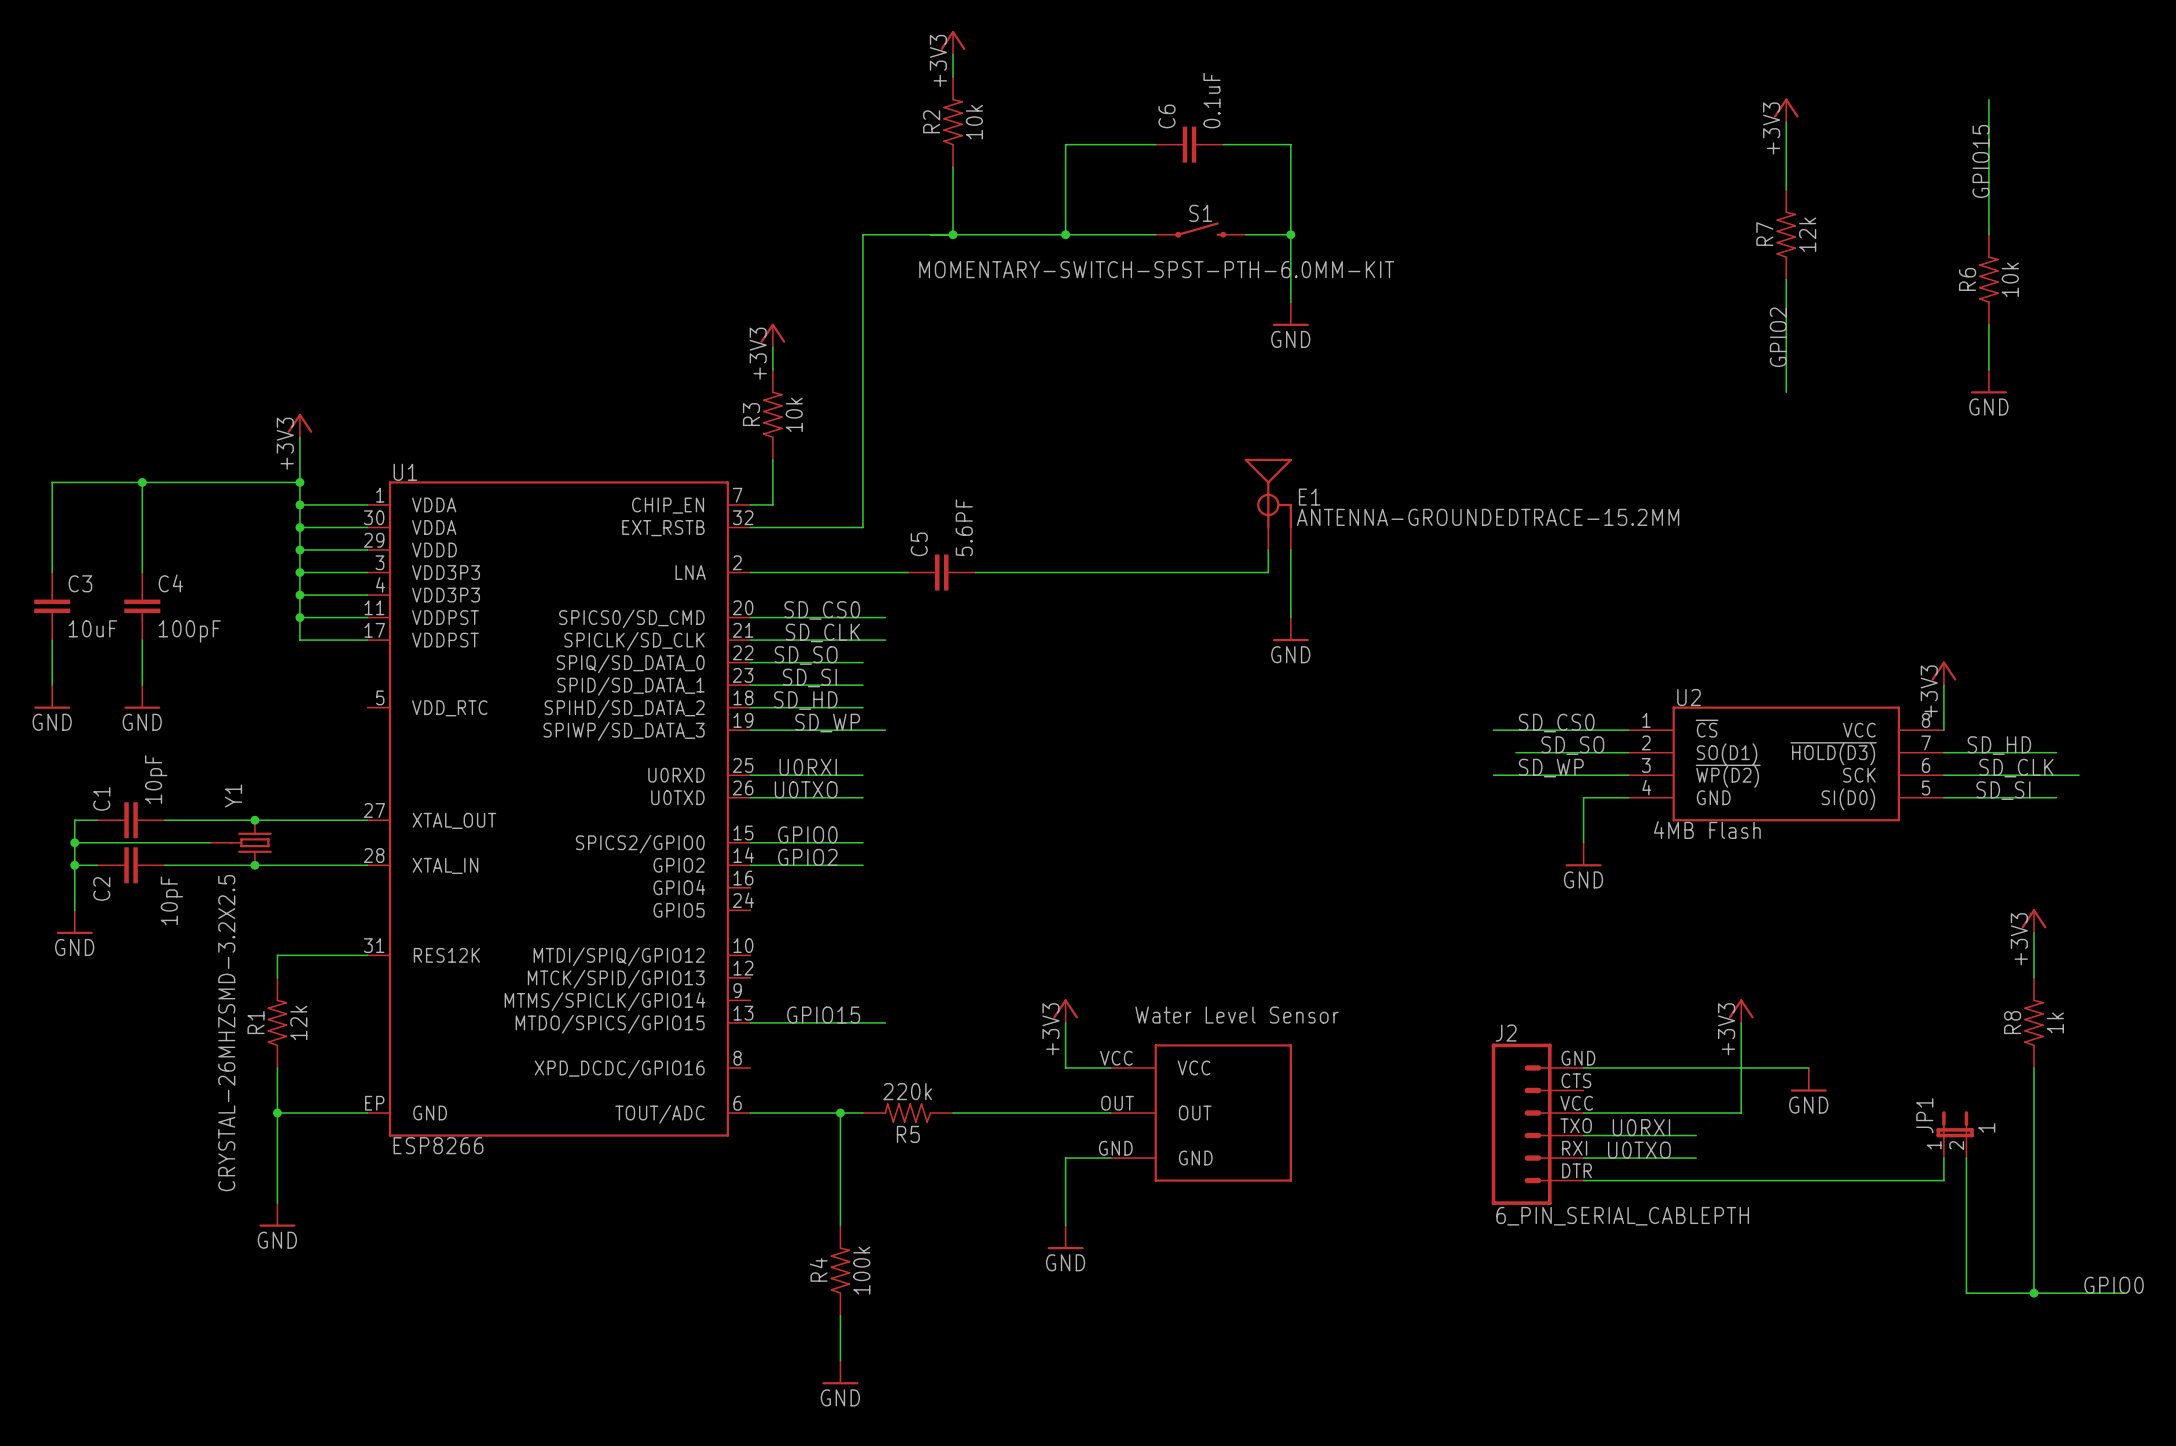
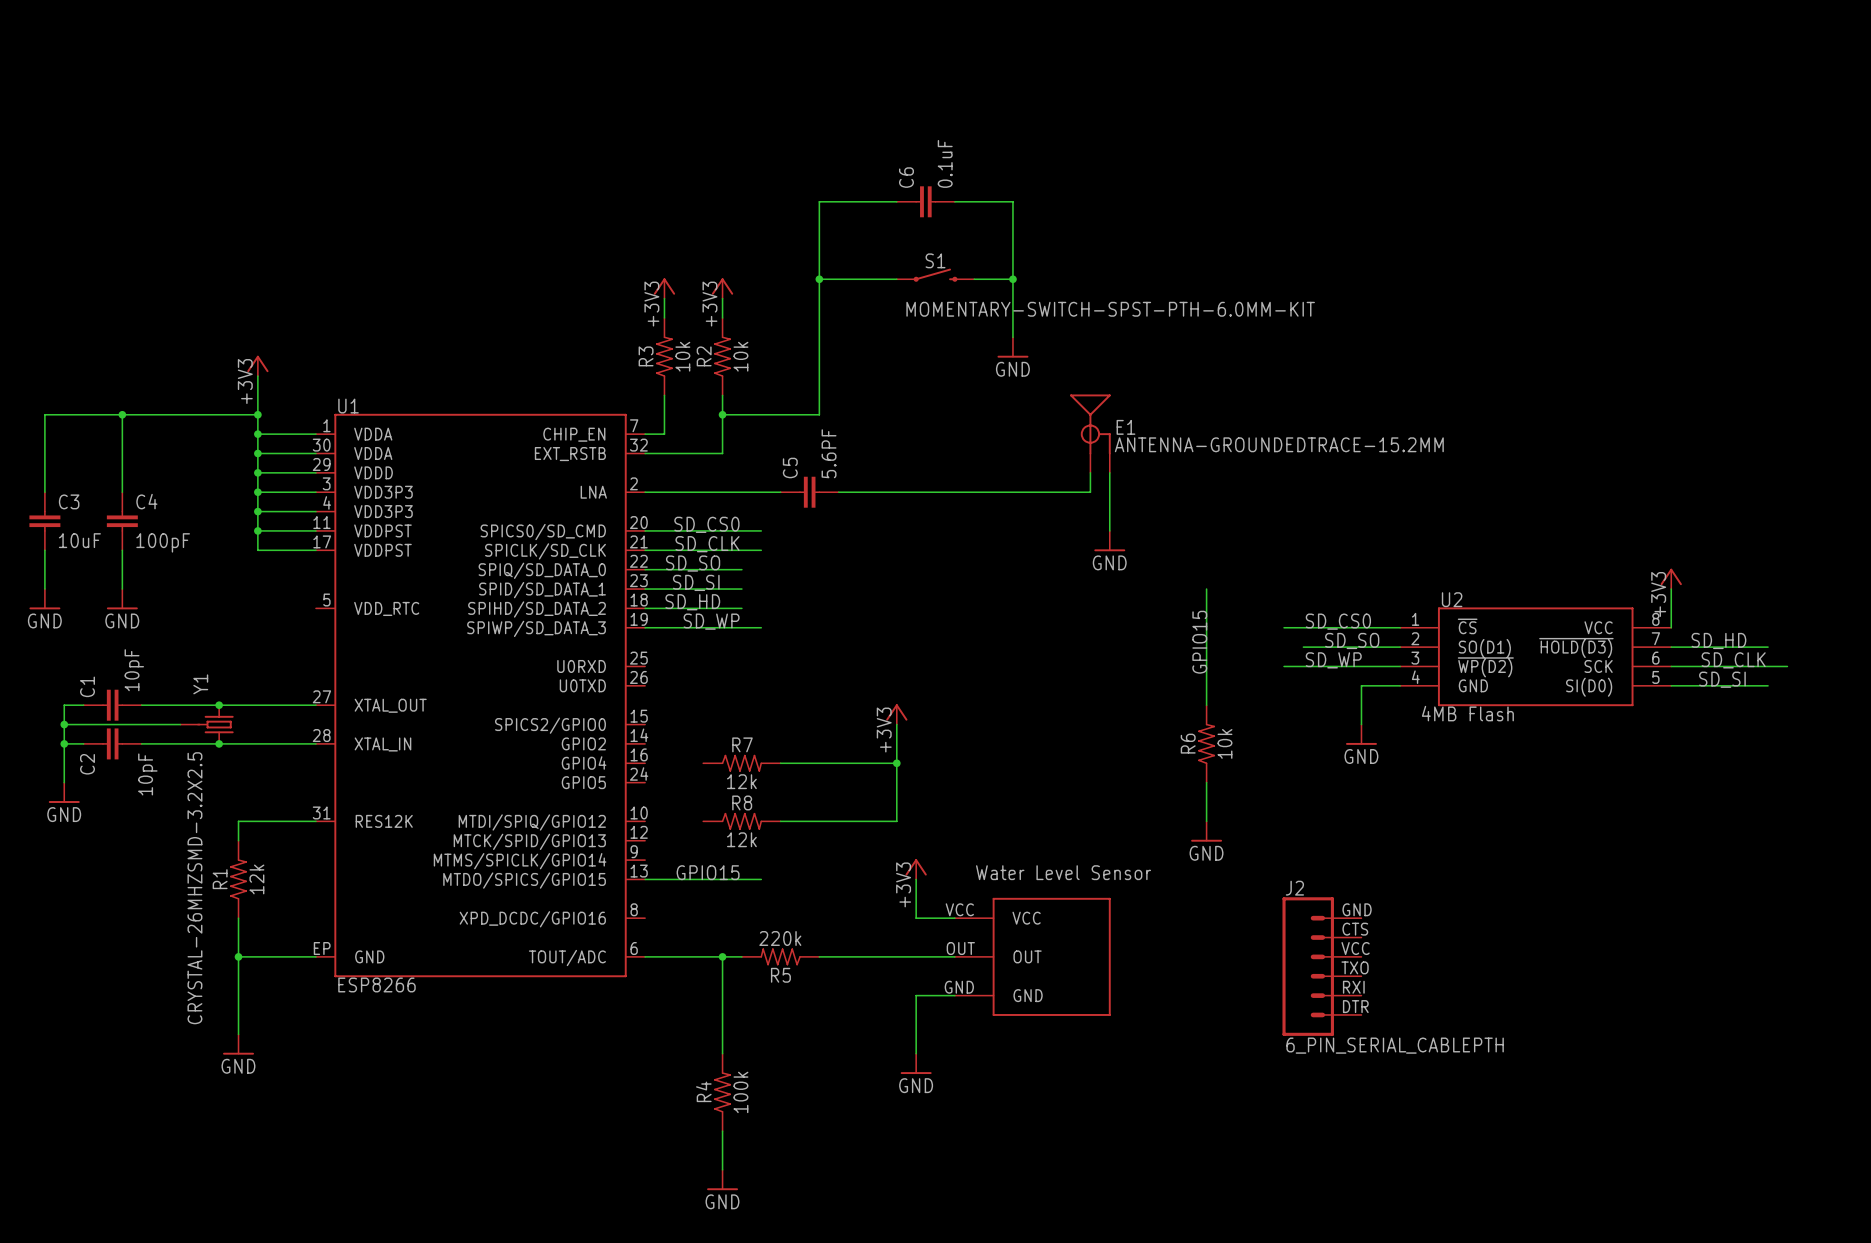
power symbol: +3V3 (953, 42) -> none
wire: (953, 54) (953, 77) -> none
wire: (1988, 99) (1988, 234) -> none
power symbol: +3V3 (1786, 110) -> none
R2 position: (953, 122) -> (722, 356)
wire: (1786, 122) (1786, 189) -> none
wire: (1155, 144) (1065, 144) (1065, 234) -> none
C6 position: (1189, 144) -> (925, 201)
wire: (1223, 144) (1290, 144) (1290, 302) -> none
label: GPIO15 (1981, 161) -> none
wire: (953, 167) (953, 234) (862, 234) (862, 527) (840, 527) -> (722, 395) (722, 453)
S1 position: (1200, 230) -> (935, 275)
wire: none -> (819, 201) (819, 414) (722, 414)
junction: (953, 234) -> none
junction: (1065, 234) -> none
wire: none -> (993, 201) (1012, 201) (1012, 337)
wire: (1245, 234) (1290, 234) -> (974, 279) (1012, 279)
junction: (1290, 234) -> none
R7 rotation: 0° (1786, 234) -> 90° clockwise (741, 763)
R7 position: (1786, 234) -> (741, 763)
S1 value position: MOMENTARY-SWITCH-SPST-PTH-6.0MM-KIT (1156, 269) -> MOMENTARY-SWITCH-SPST-PTH-6.0MM-KIT (1110, 309)
wire: (1786, 279) (1786, 392) -> none
R6 position: (1988, 279) -> (1206, 743)
power symbol position: GND (1290, 314) -> GND (1012, 347)
wire: none -> (819, 279) (896, 279)
junction: none -> (819, 279)
junction: none -> (1012, 279)
wire: (1988, 324) (1988, 369) -> none
power symbol: none -> +3V3 (722, 288)
label: GPIO2 (1778, 337) -> none
wire: none -> (722, 298) (722, 317)
power symbol: GND (1988, 381) -> none
junction: none -> (722, 414)
wire: none -> (1206, 589) (1206, 705)
label: none -> GPIO15 (1199, 642)
label: U0RXI (808, 767) -> none
wire: (750, 775) (862, 775) -> none
label: U0TXO (806, 789) -> none
wire: (750, 797) (862, 797) -> none
power symbol: none -> +3V3 (896, 714)
label: GPIO0 (807, 834) -> none
wire: (750, 842) (862, 842) -> none
wire: none -> (896, 724) (896, 821) (780, 821)
label: GPIO2 (807, 857) -> none
wire: (750, 865) (862, 865) -> none
wire: none -> (780, 763) (896, 763)
junction: none -> (896, 763)
wire: none -> (1206, 782) (1206, 821)
power symbol: +3V3 (2033, 921) -> none
wire: (2033, 932) (2033, 977) -> none
power symbol: none -> GND (1206, 831)
power symbol: +3V3 (1741, 1011) -> none
wire: (1741, 1022) (1741, 1113) (1583, 1113) -> none
R8 rotation: 0° (2033, 1022) -> 90° clockwise (741, 821)
R8 position: (2033, 1022) -> (741, 821)
R8 value: 1k (2055, 1022) -> 12k (741, 839)
wire: (1583, 1067) (1808, 1067) -> none
wire: (2033, 1067) (2033, 1293) -> none
power symbol: GND (1808, 1079) -> none
label: U0RXI (1641, 1127) -> none
JP1: 1 (1955, 1134) -> none
wire: (1583, 1135) (1696, 1135) -> none
label: U0TXO (1639, 1150) -> none
wire: (1583, 1158) (1696, 1158) -> none
wire: (1943, 1158) (1943, 1180) (1583, 1180) -> none
wire: (1966, 1158) (1966, 1293) (2124, 1293) -> none
label: GPIO0 (2114, 1285) -> none
junction: (2033, 1293) -> none

